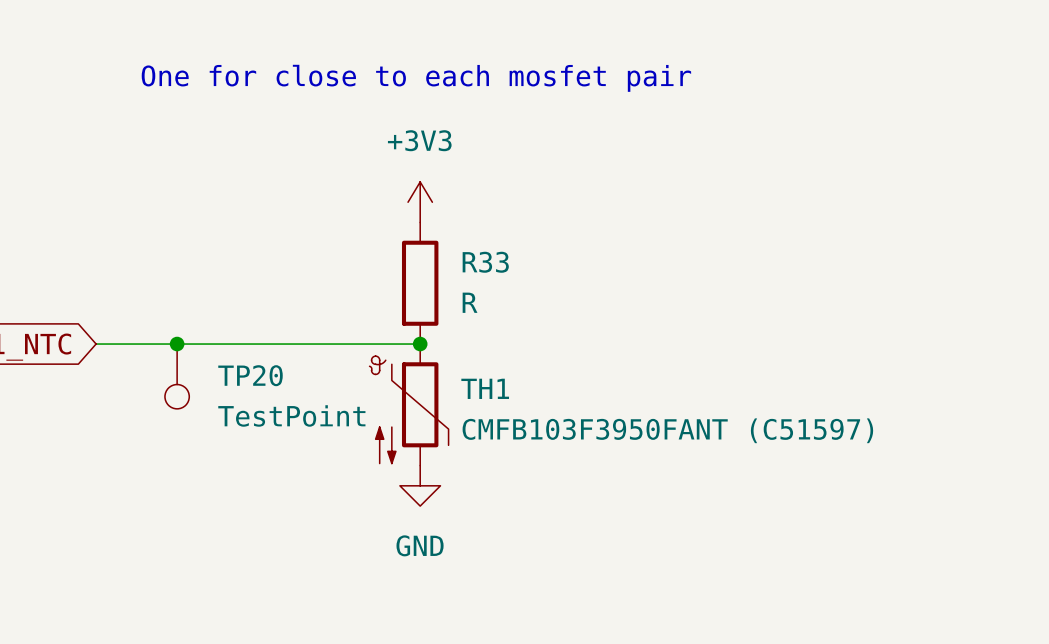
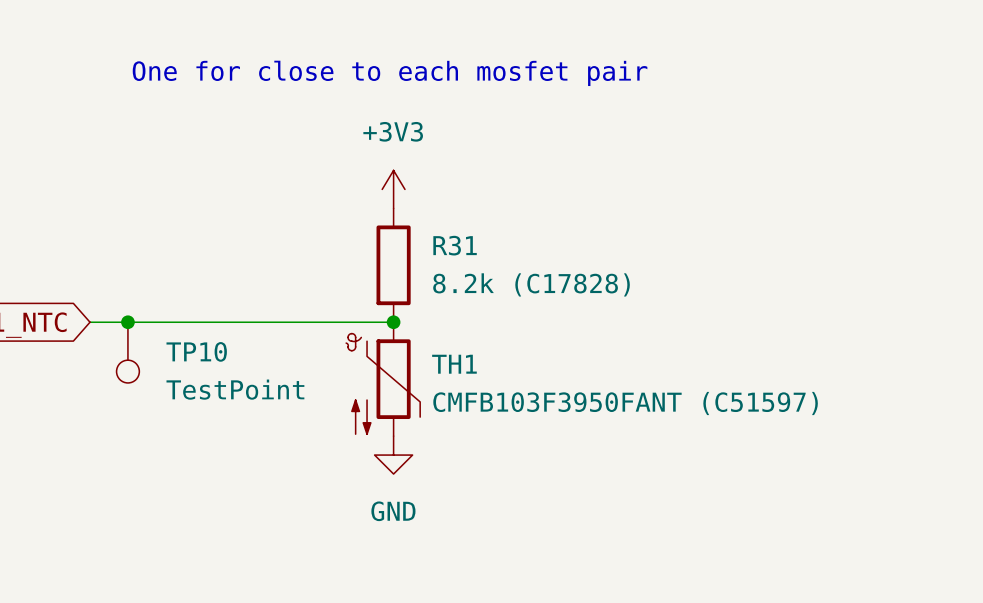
R33 name: R33 (485, 262) -> R31 (455, 245)
R33 value: R (470, 302) -> 8.2k (C17828) (531, 284)
junction position: (177, 344) -> (127, 322)
TP10: none -> TestPoint (127, 352)
TP20: TestPoint (177, 376) -> none

